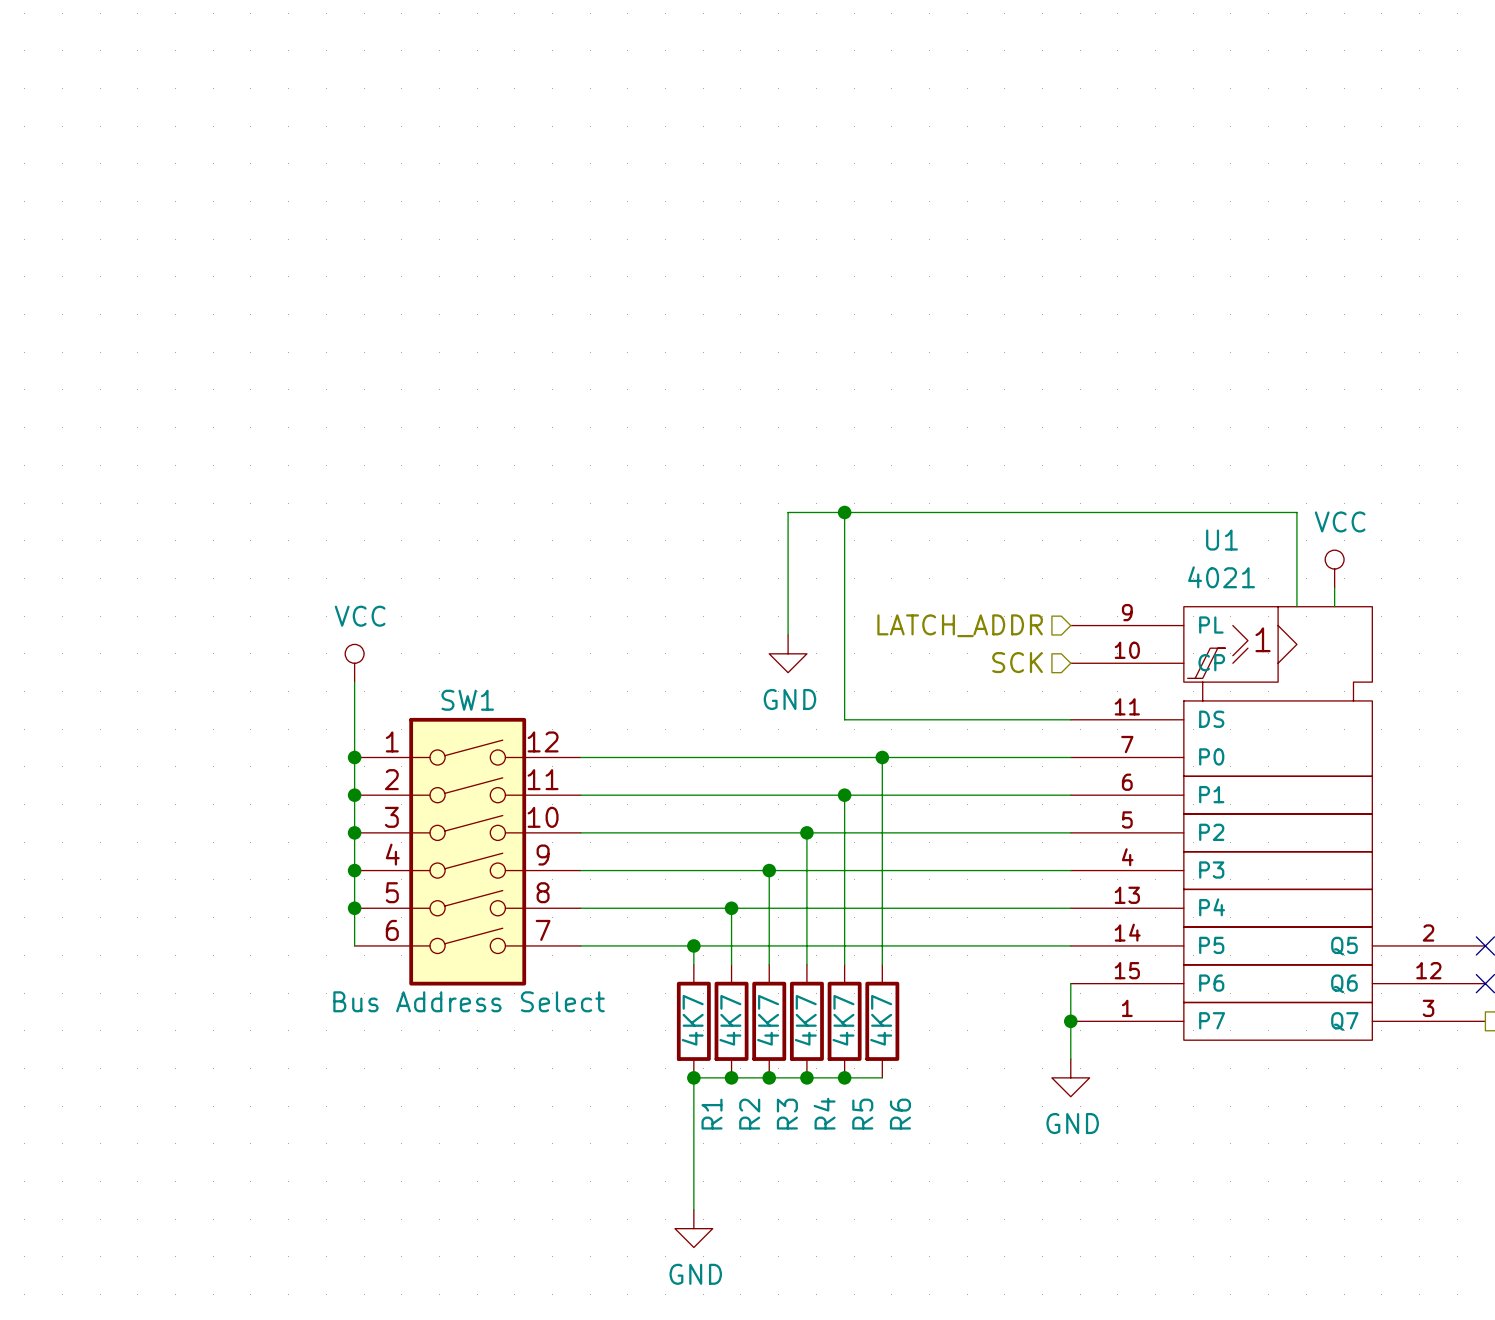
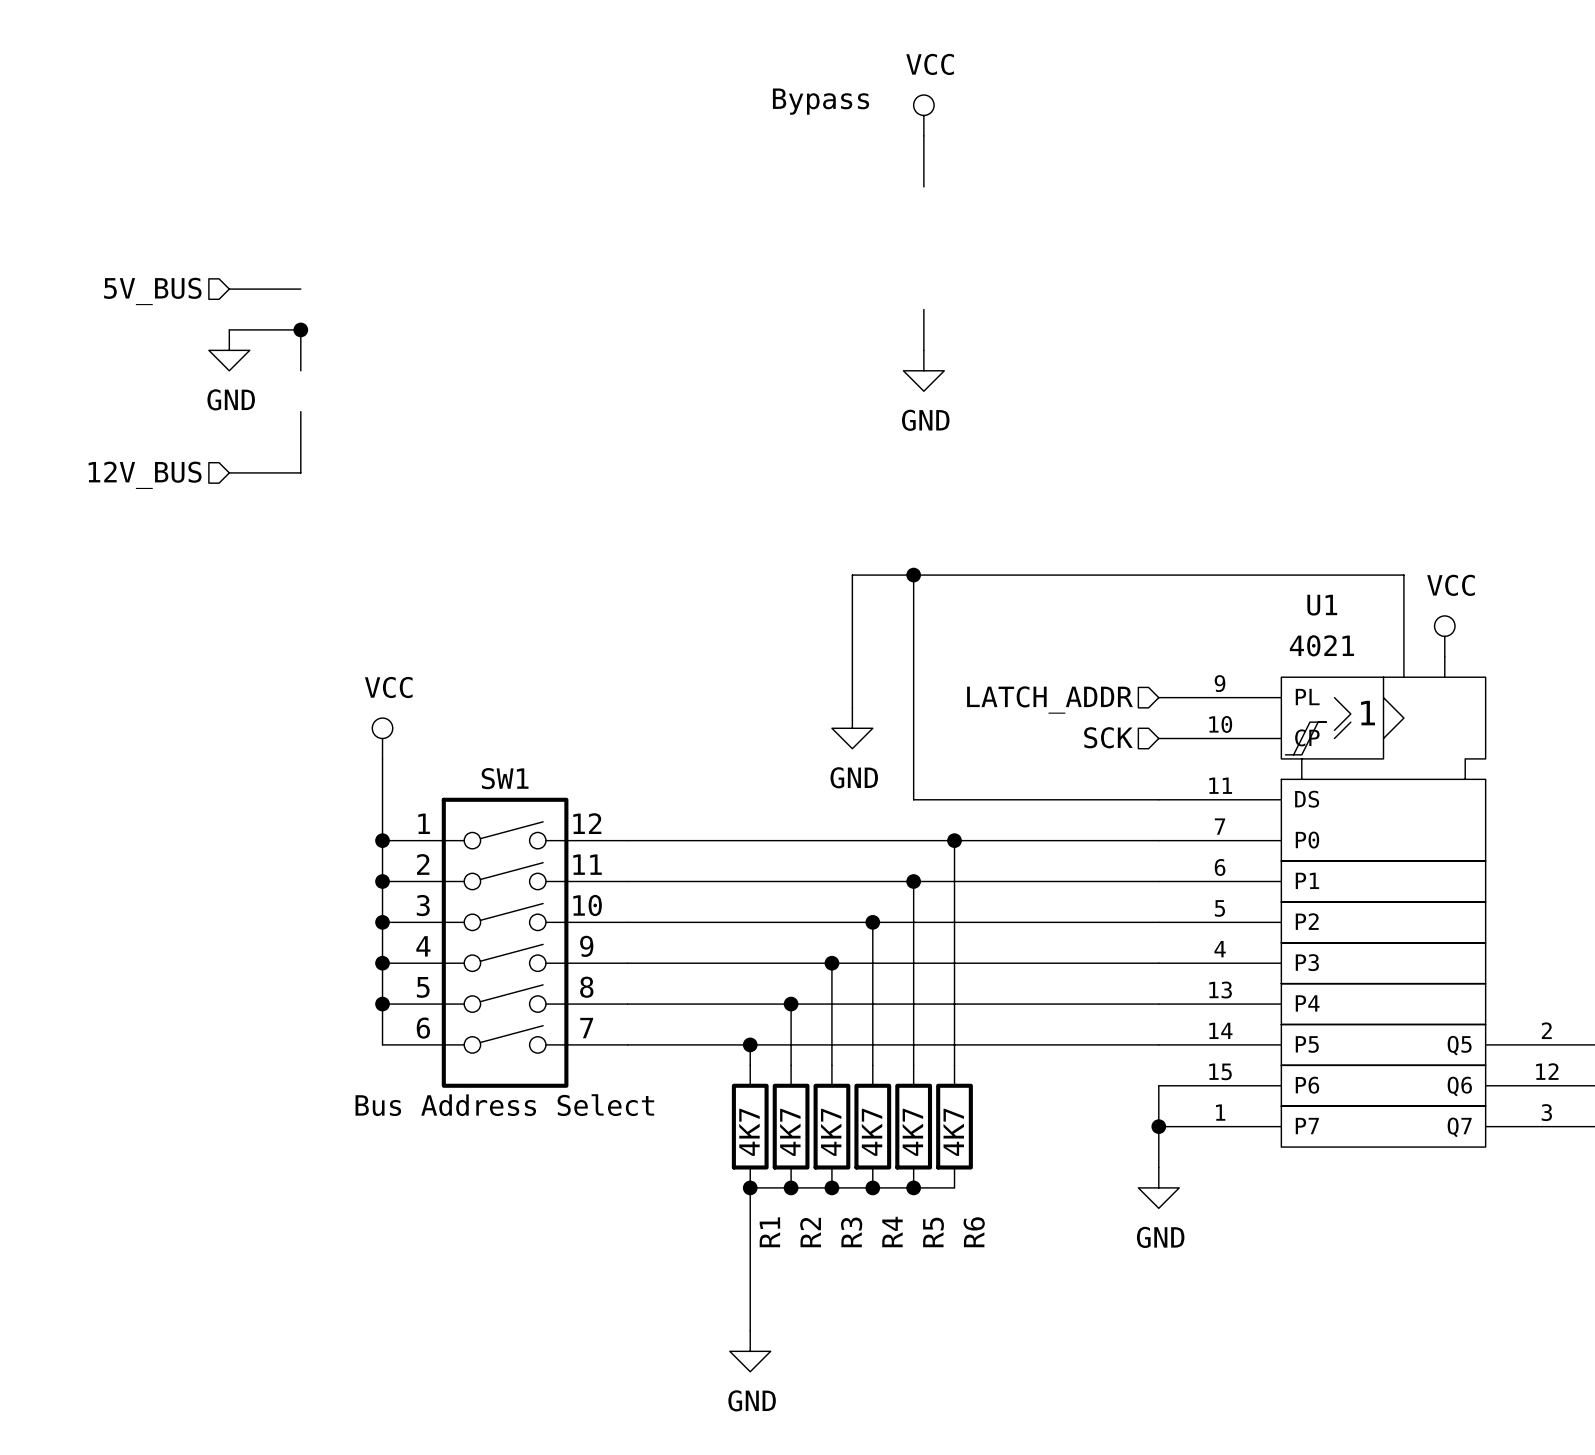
text: none -> Bypass (821, 101)
power symbol: none -> VCC (923, 115)
wire: none -> (923, 135) (923, 186)
hierarchical label: none -> 5V_BUS (152, 291)
wire: none -> (229, 289) (300, 289)
wire: none -> (923, 309) (923, 350)
wire: none -> (229, 329) (300, 329) (300, 370)
junction: none -> (300, 329)
power symbol: none -> GND (229, 350)
power symbol: none -> GND (923, 370)
wire: none -> (300, 411) (300, 472) (229, 472)
hierarchical label: none -> 12V_BUS (145, 475)

